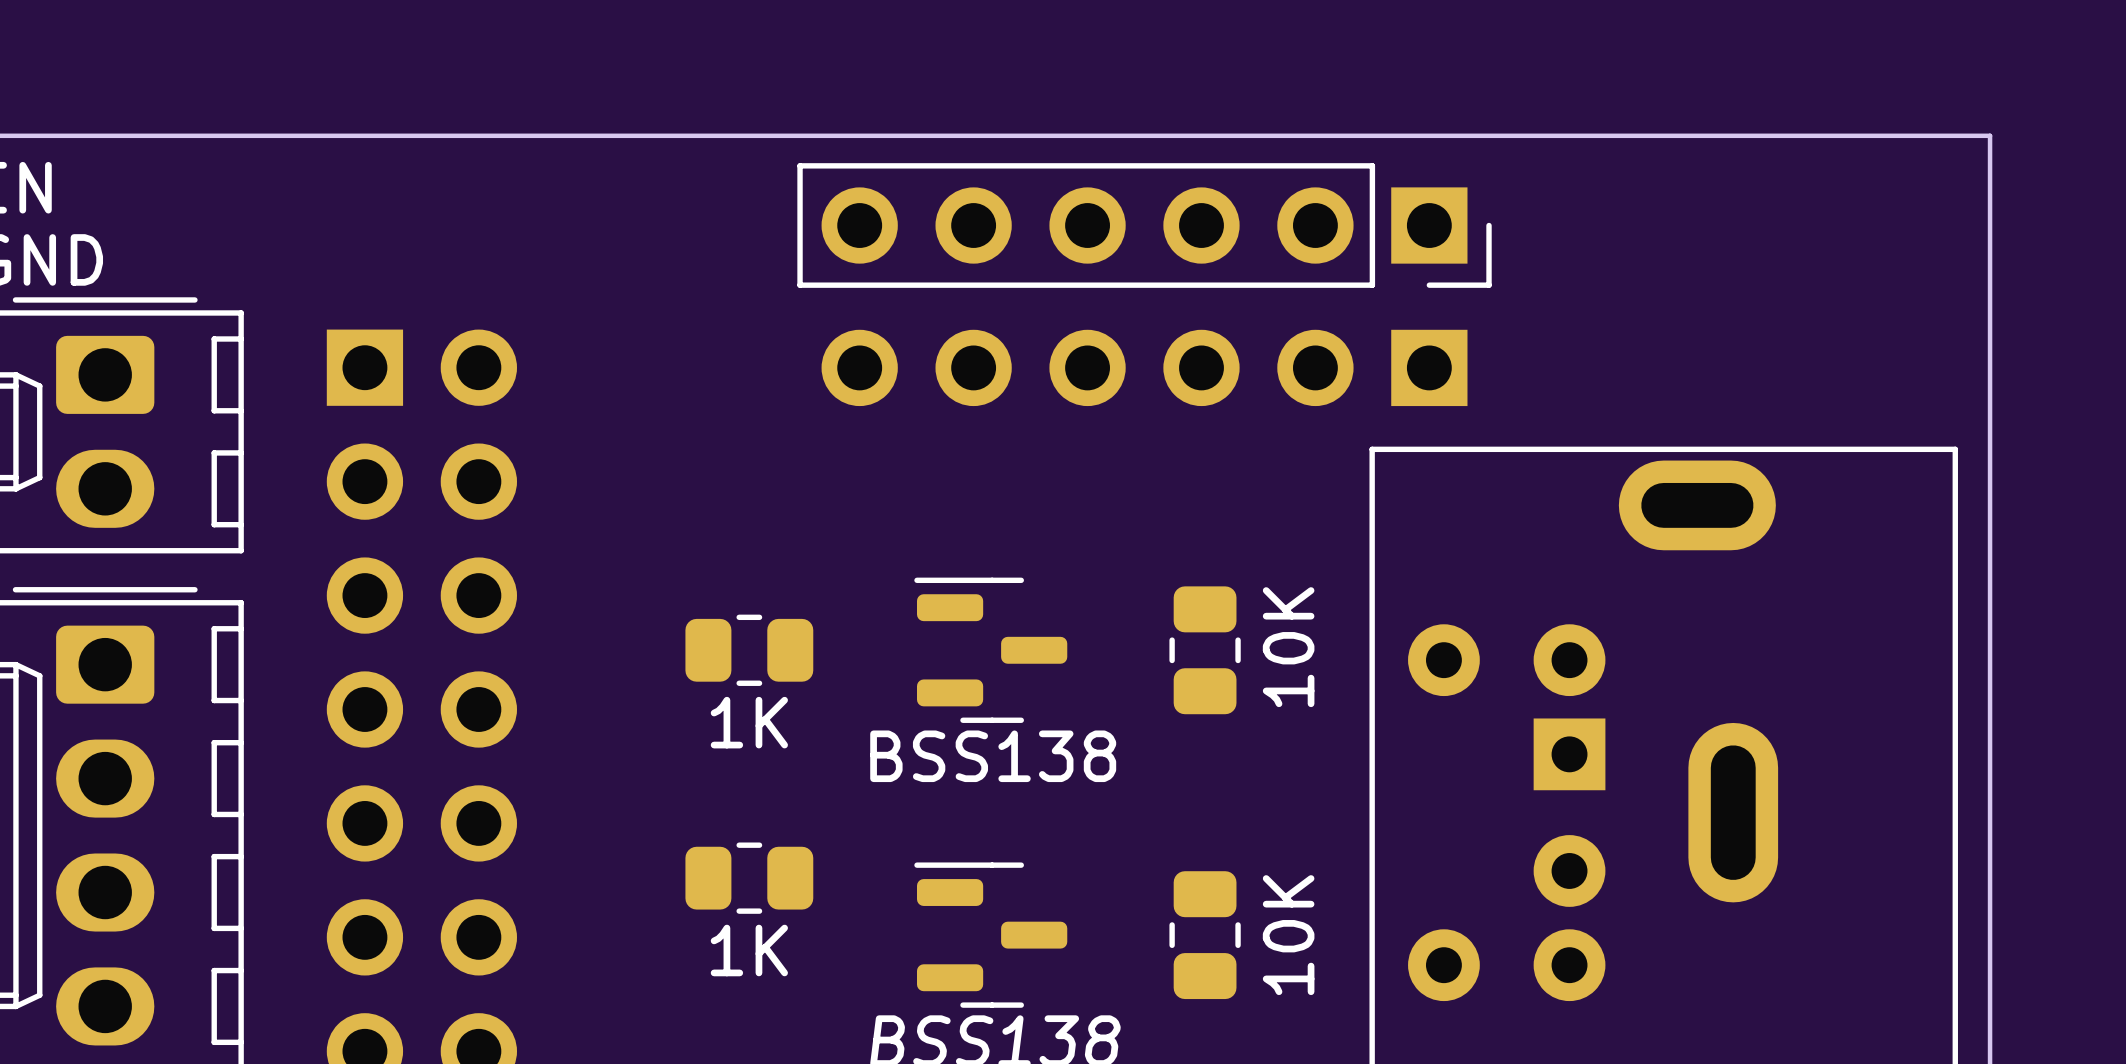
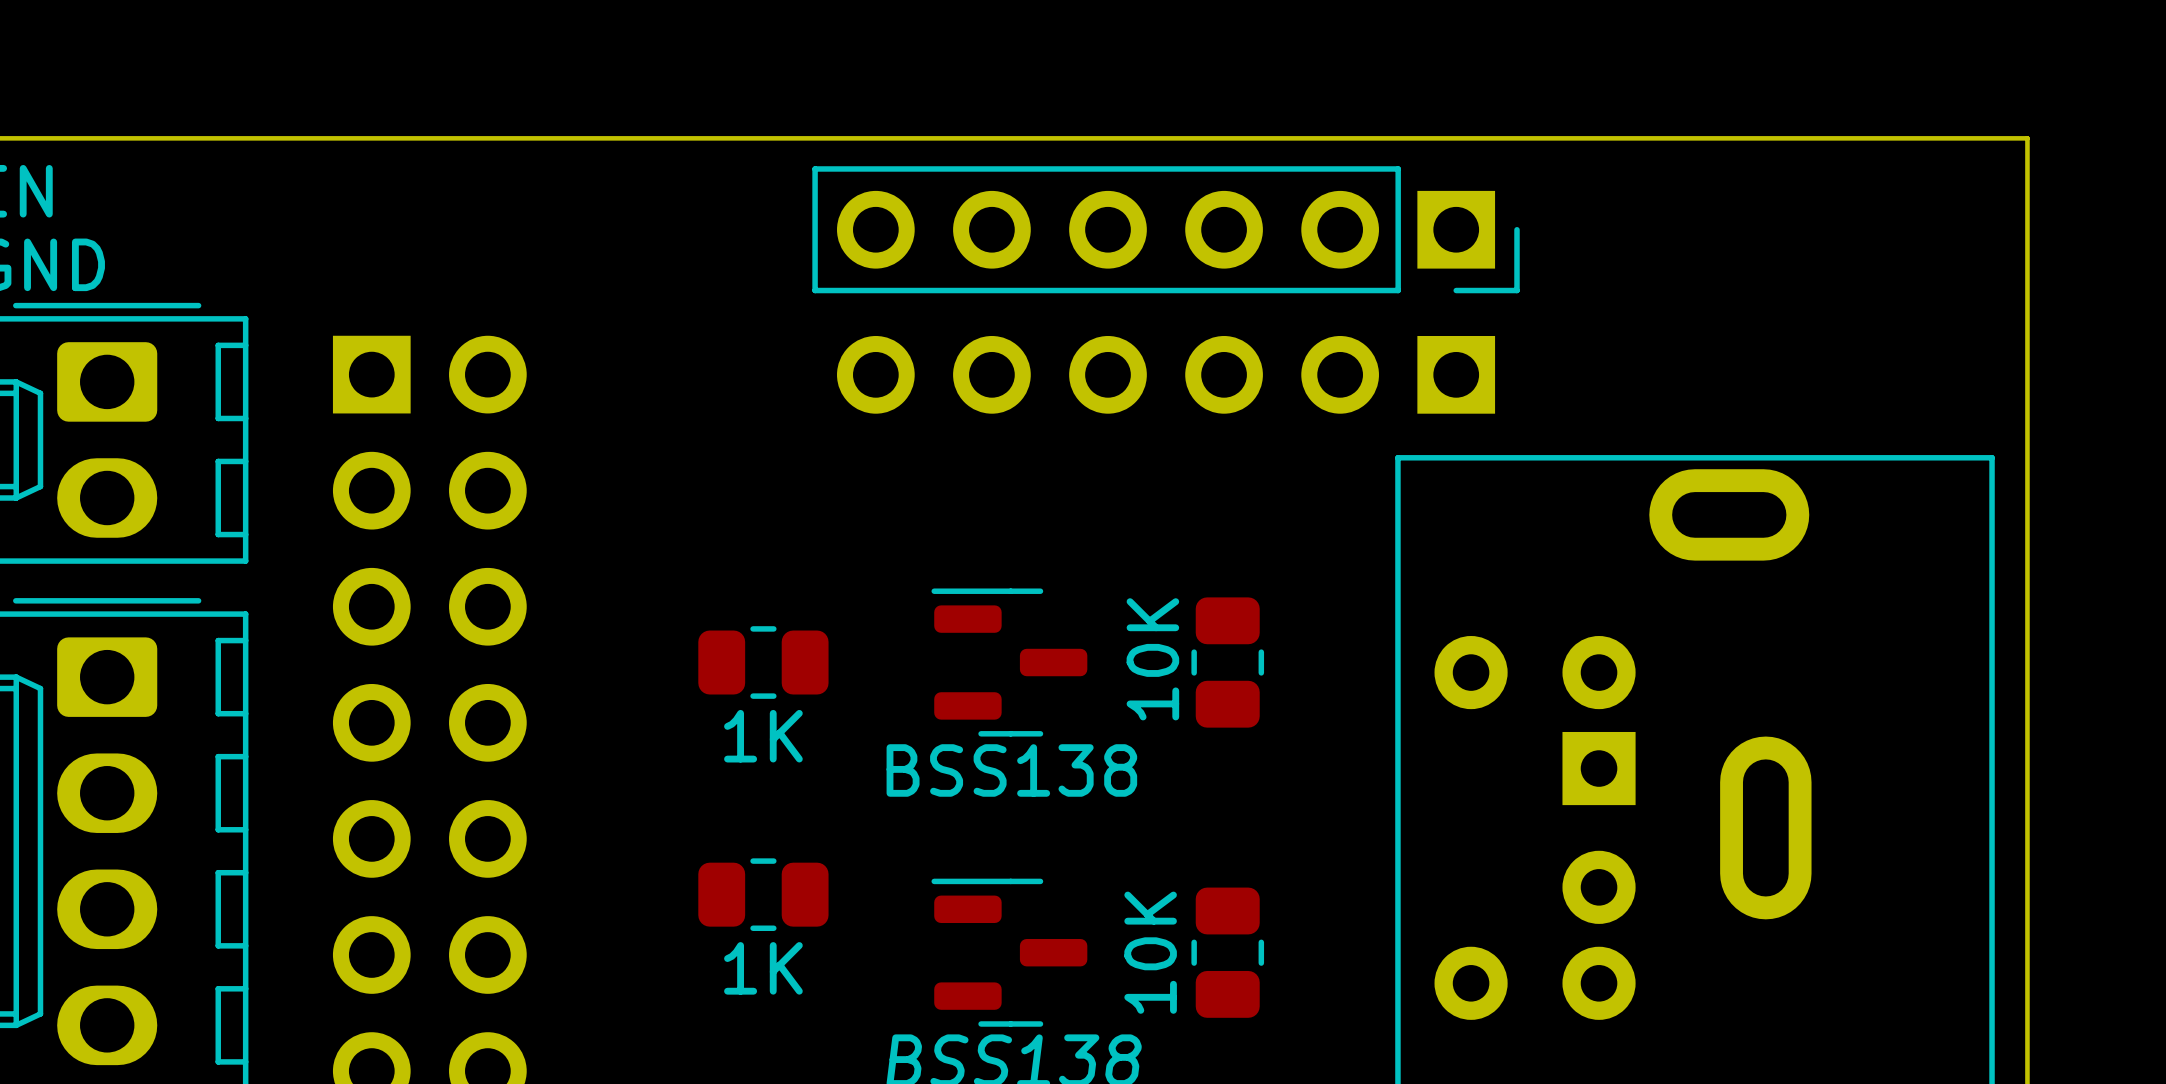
part value position: 10K (1288, 647) -> 10K (1152, 659)
part value position: 10K (1288, 935) -> 10K (1150, 952)

